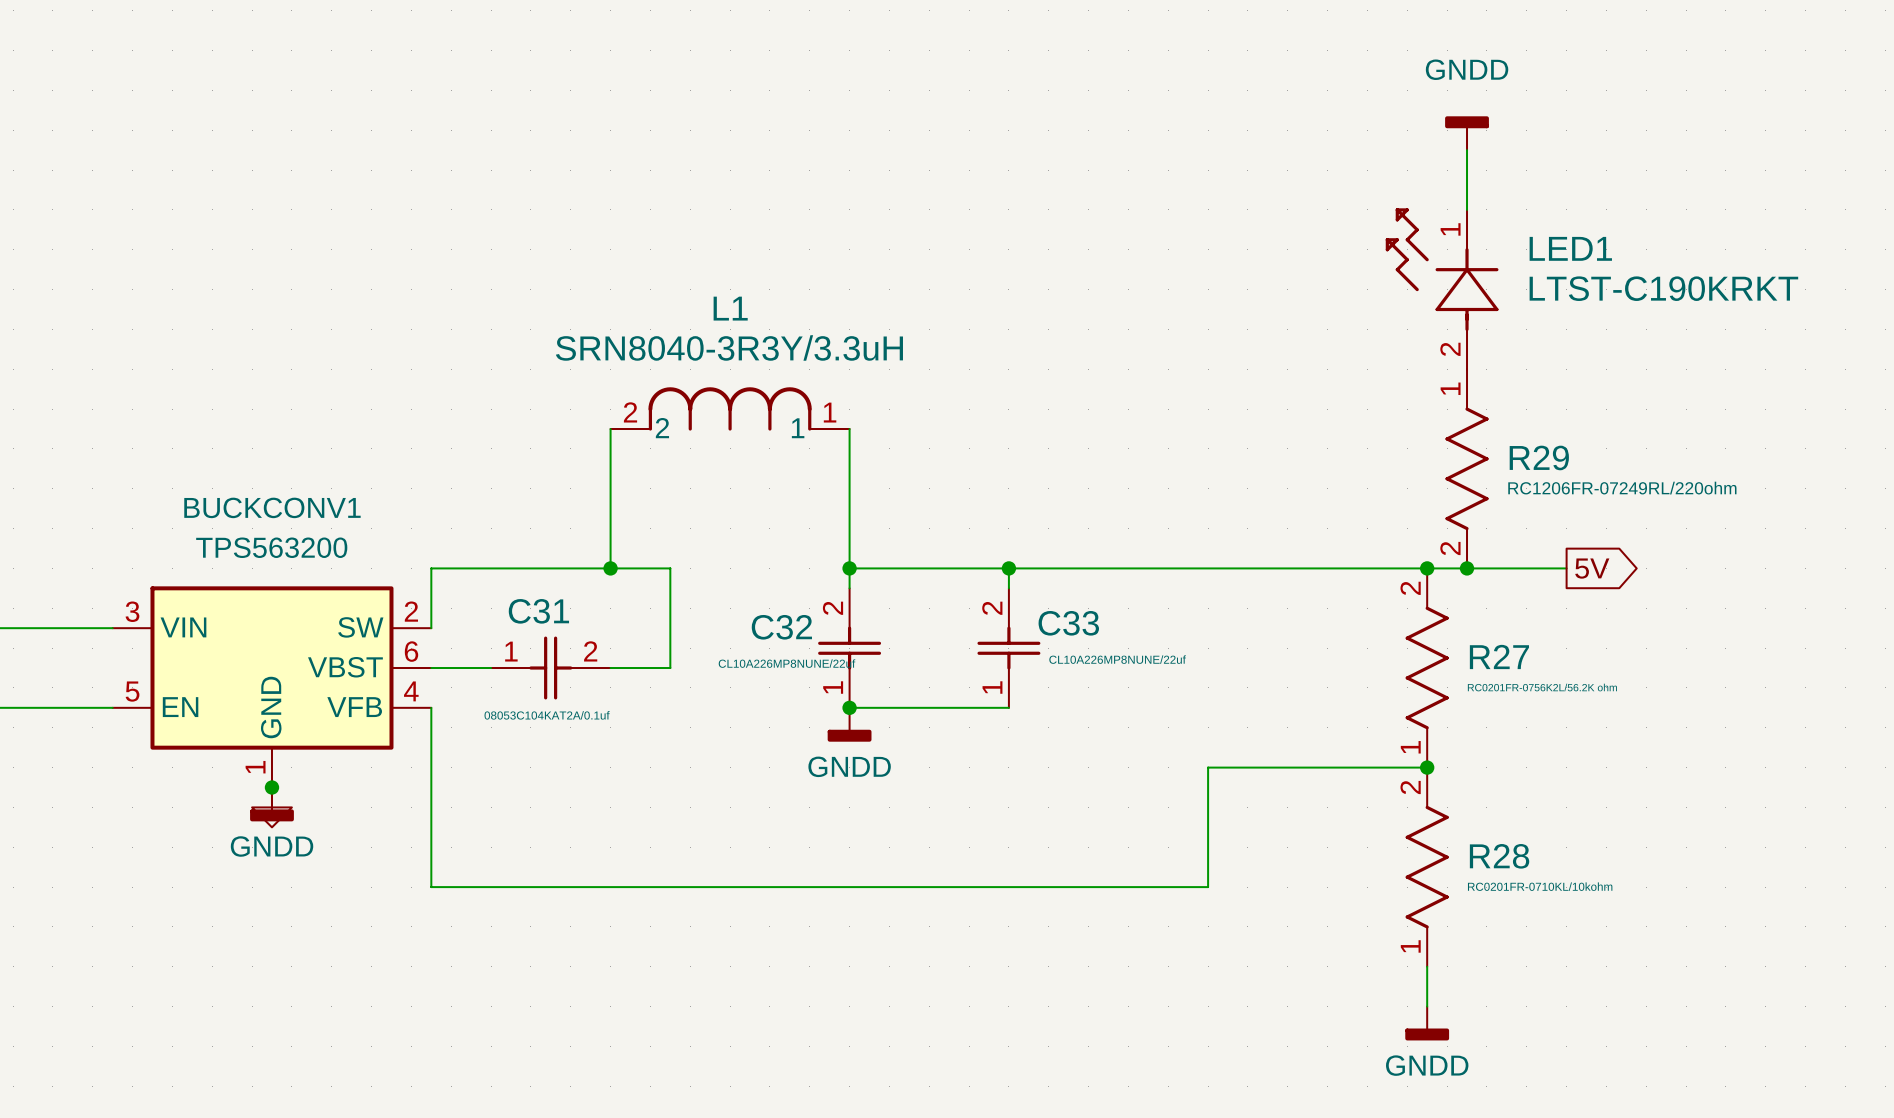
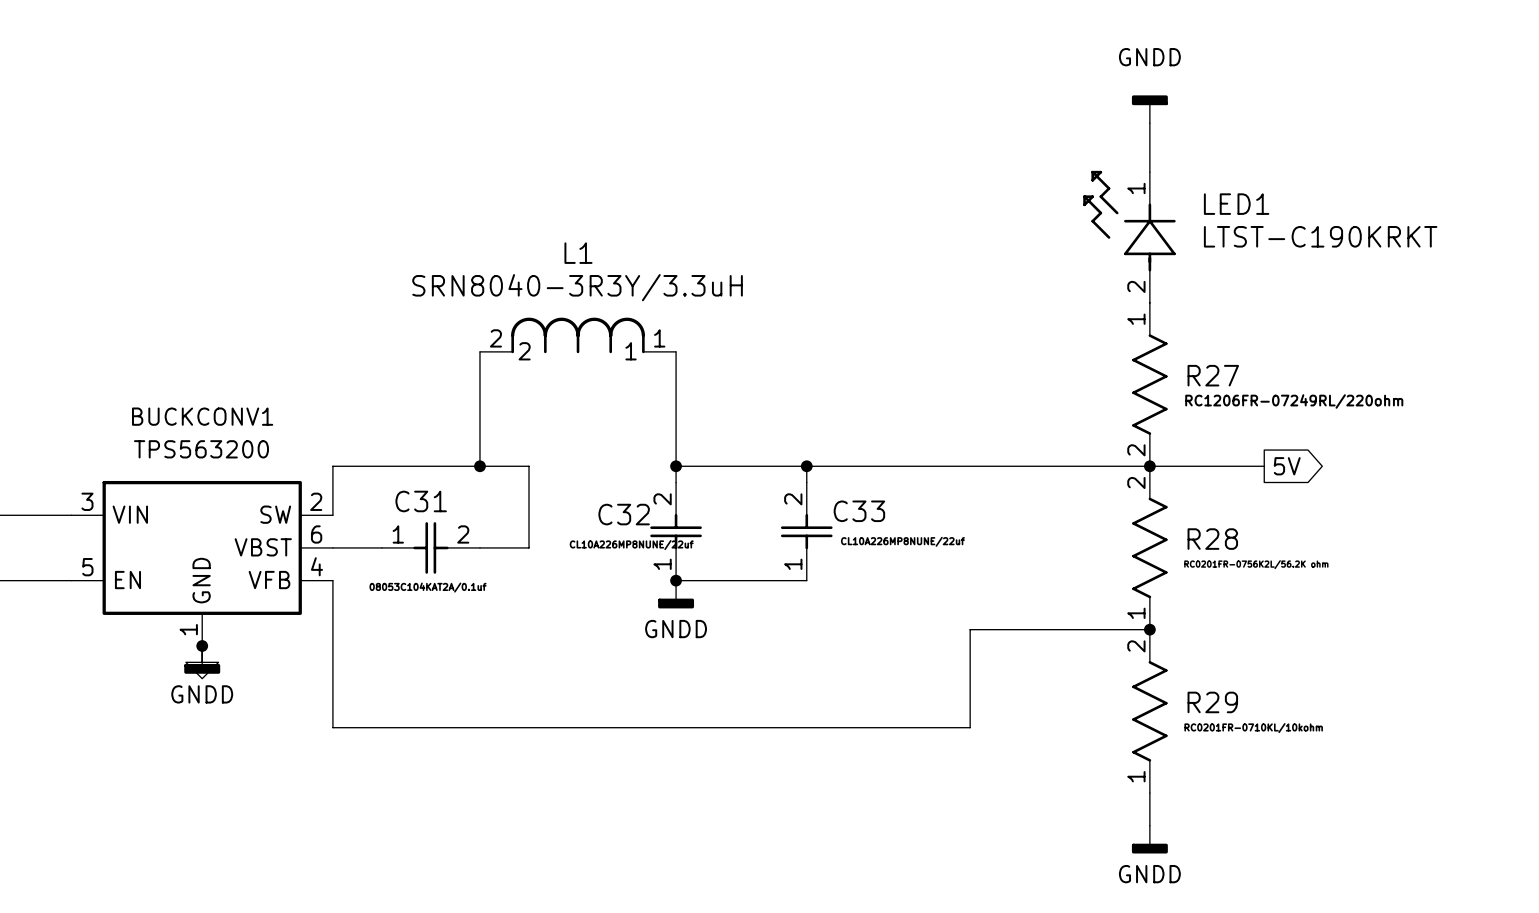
power symbol position: GNDD (1467, 133) -> GNDD (1149, 109)
wire: (1467, 150) (1467, 209) -> (1149, 123) (1149, 172)
LED1 position: (1442, 288) -> (1129, 236)
R27: none -> RC1206FR-07249RL/220ohm (1149, 384)
R29: RC1206FR-07249RL/220ohm (1467, 468) -> none
junction: (1467, 568) -> none
R27 name: R27 (1499, 656) -> R28 (1212, 539)
R28 name: R28 (1499, 856) -> R29 (1212, 702)

